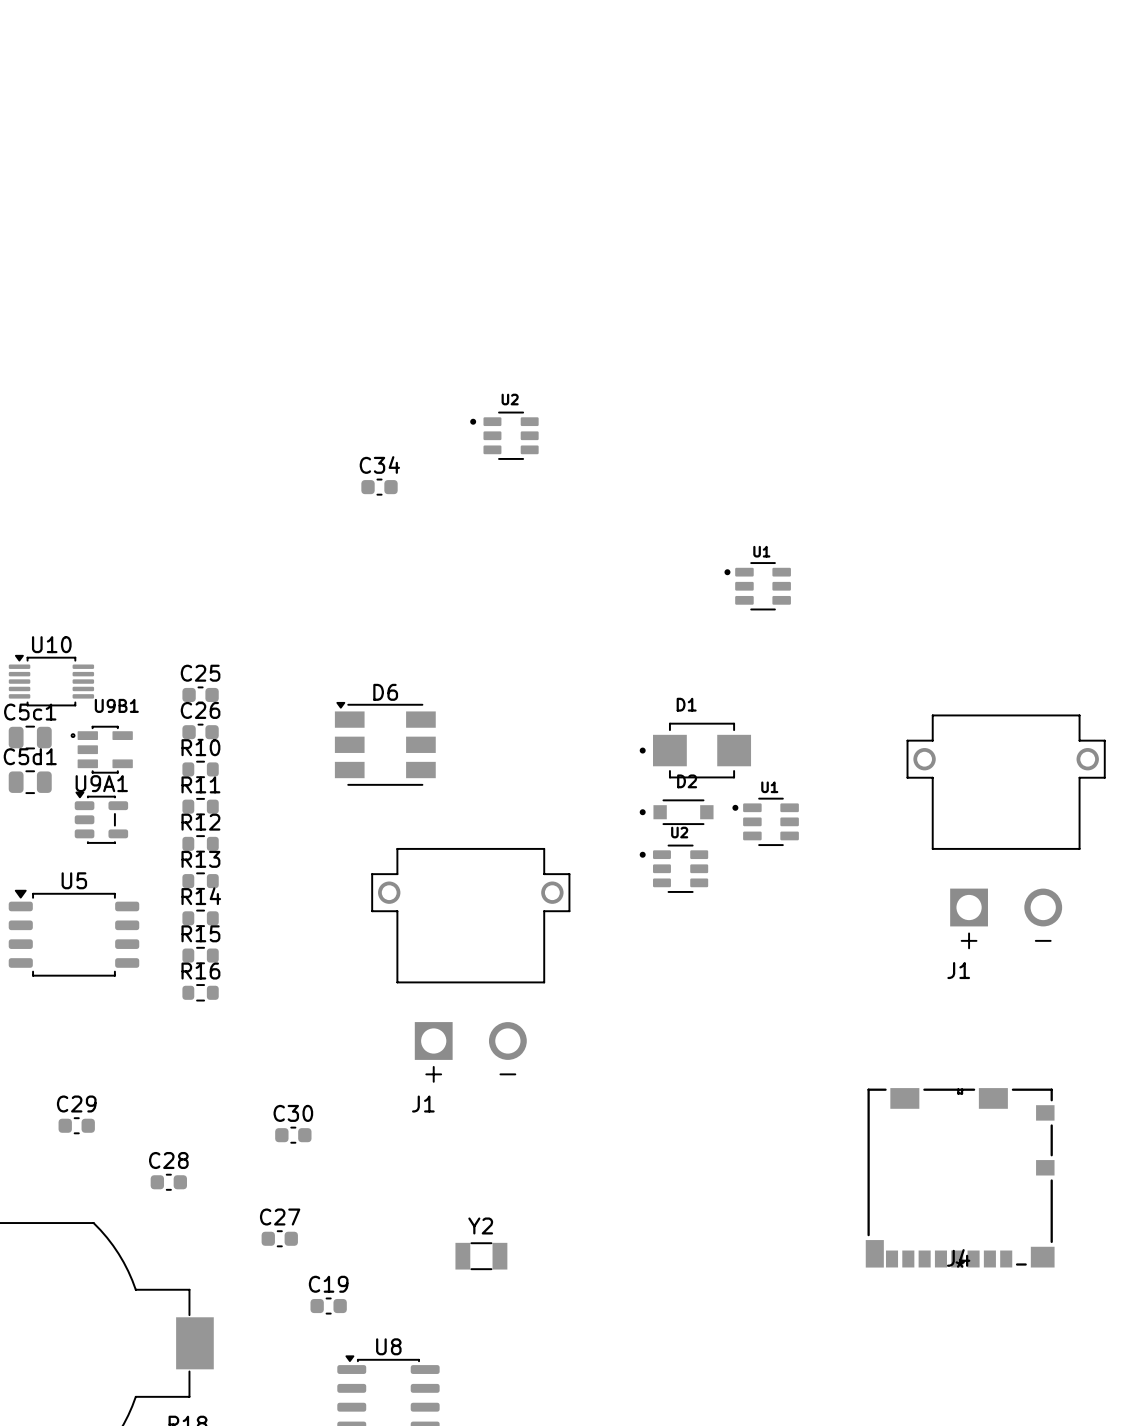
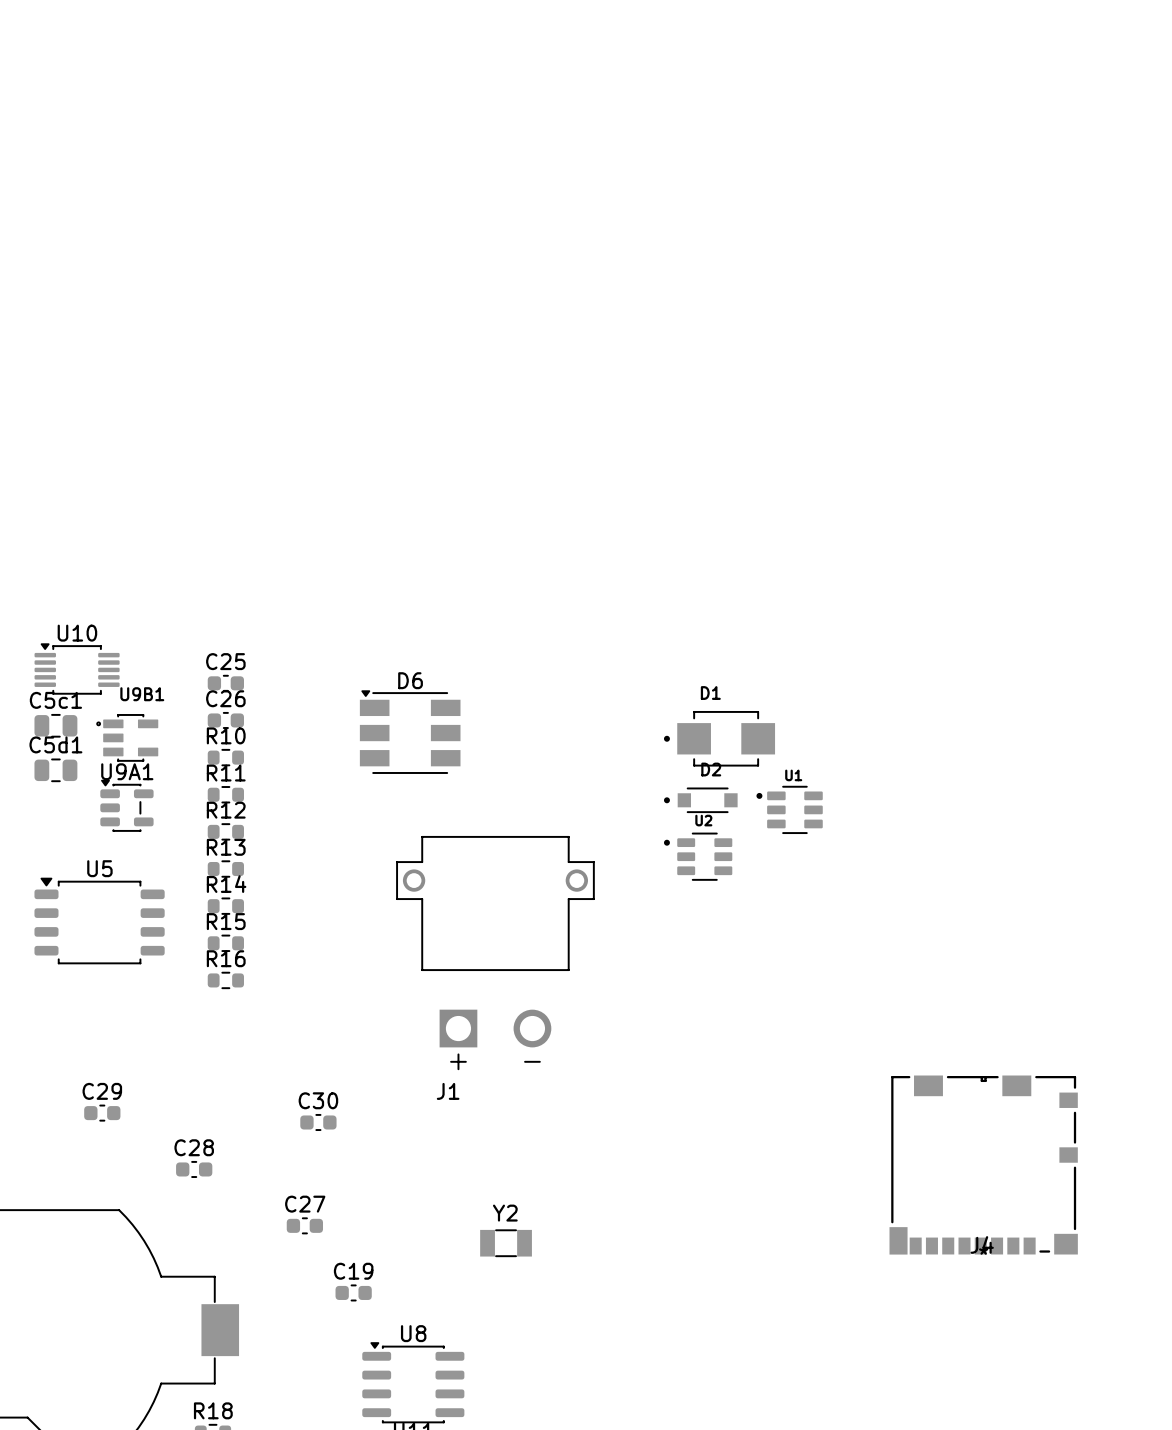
U2: (504, 435) -> none
C34: (379, 487) -> none
U1: (757, 586) -> none
J1: (1006, 831) -> none

